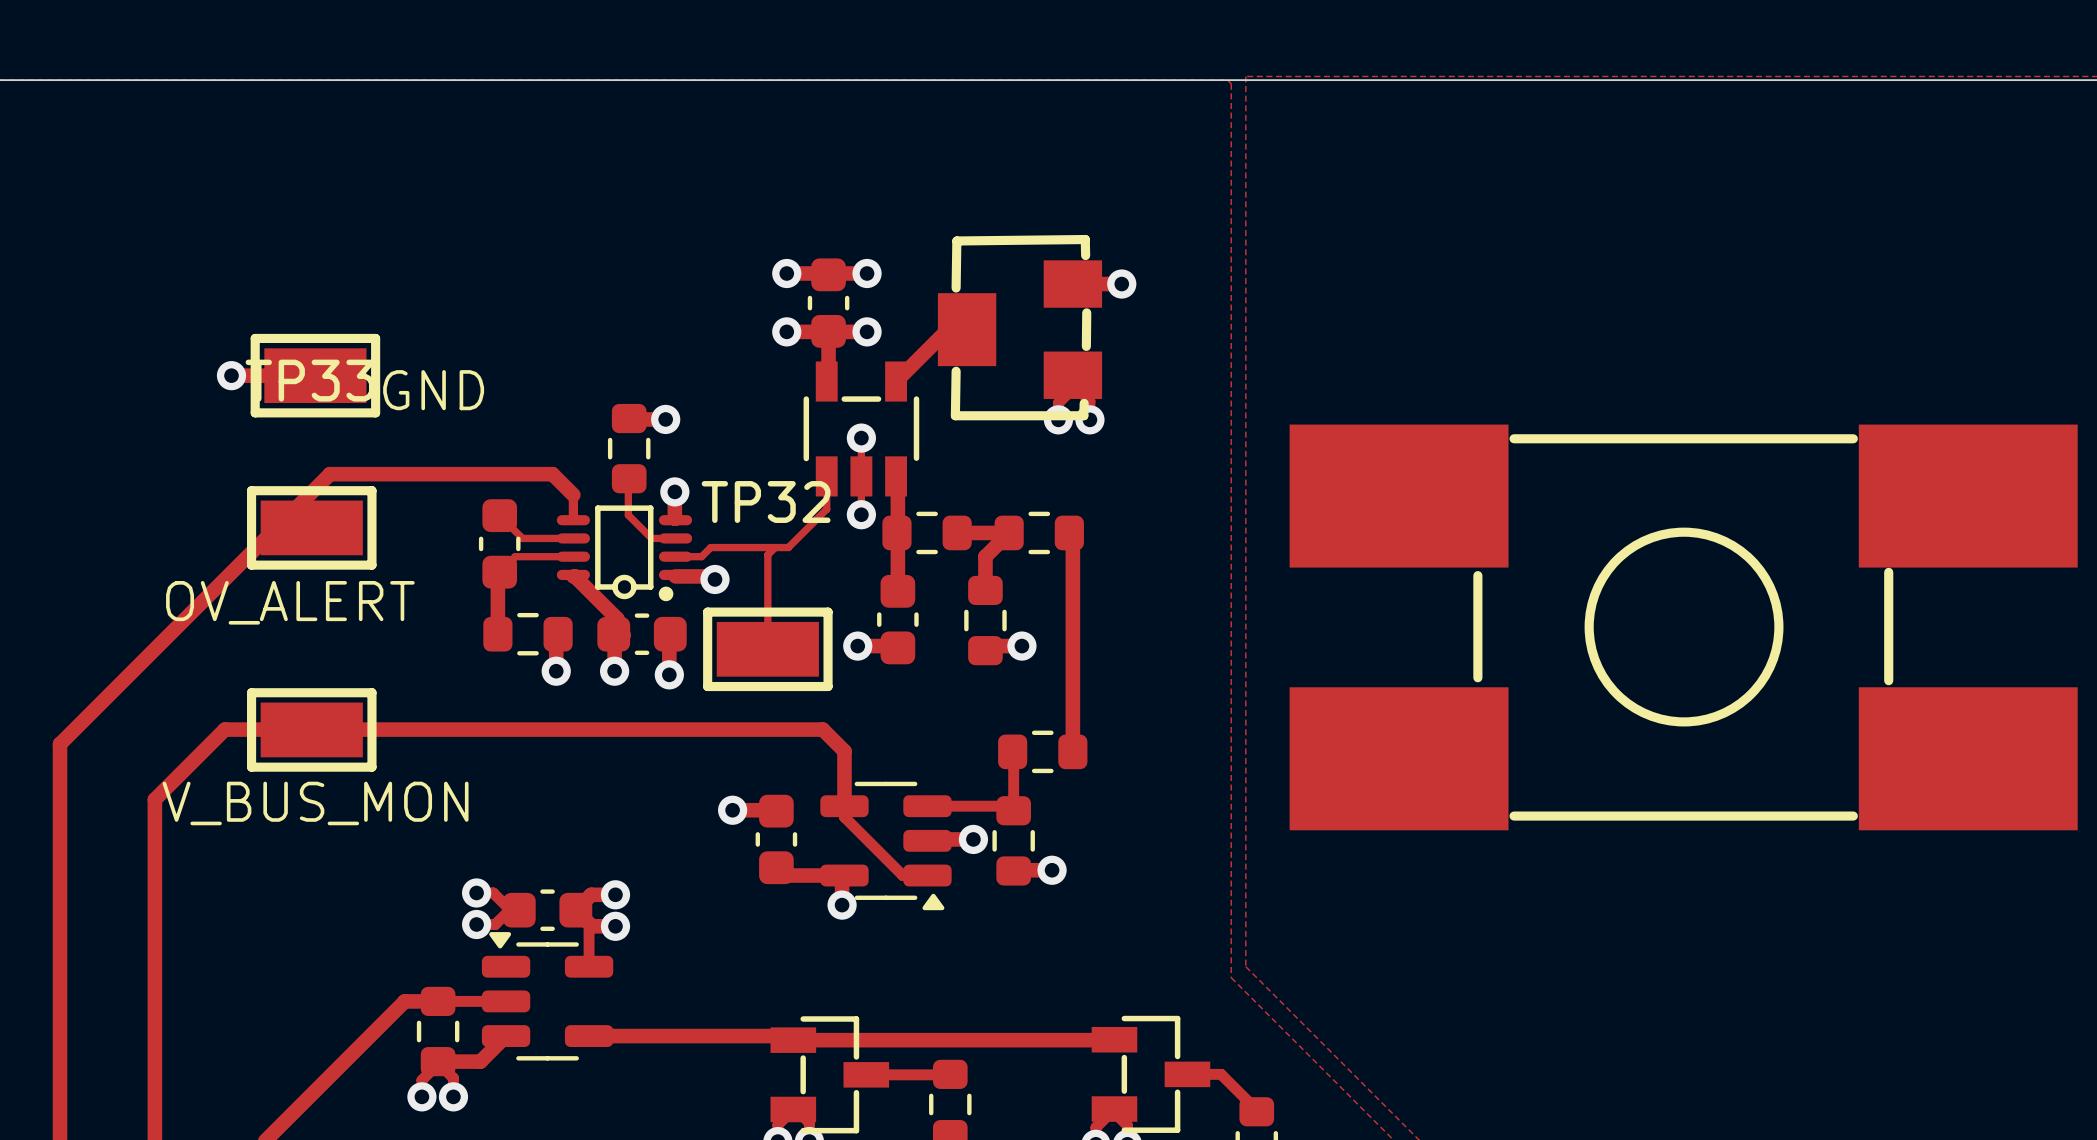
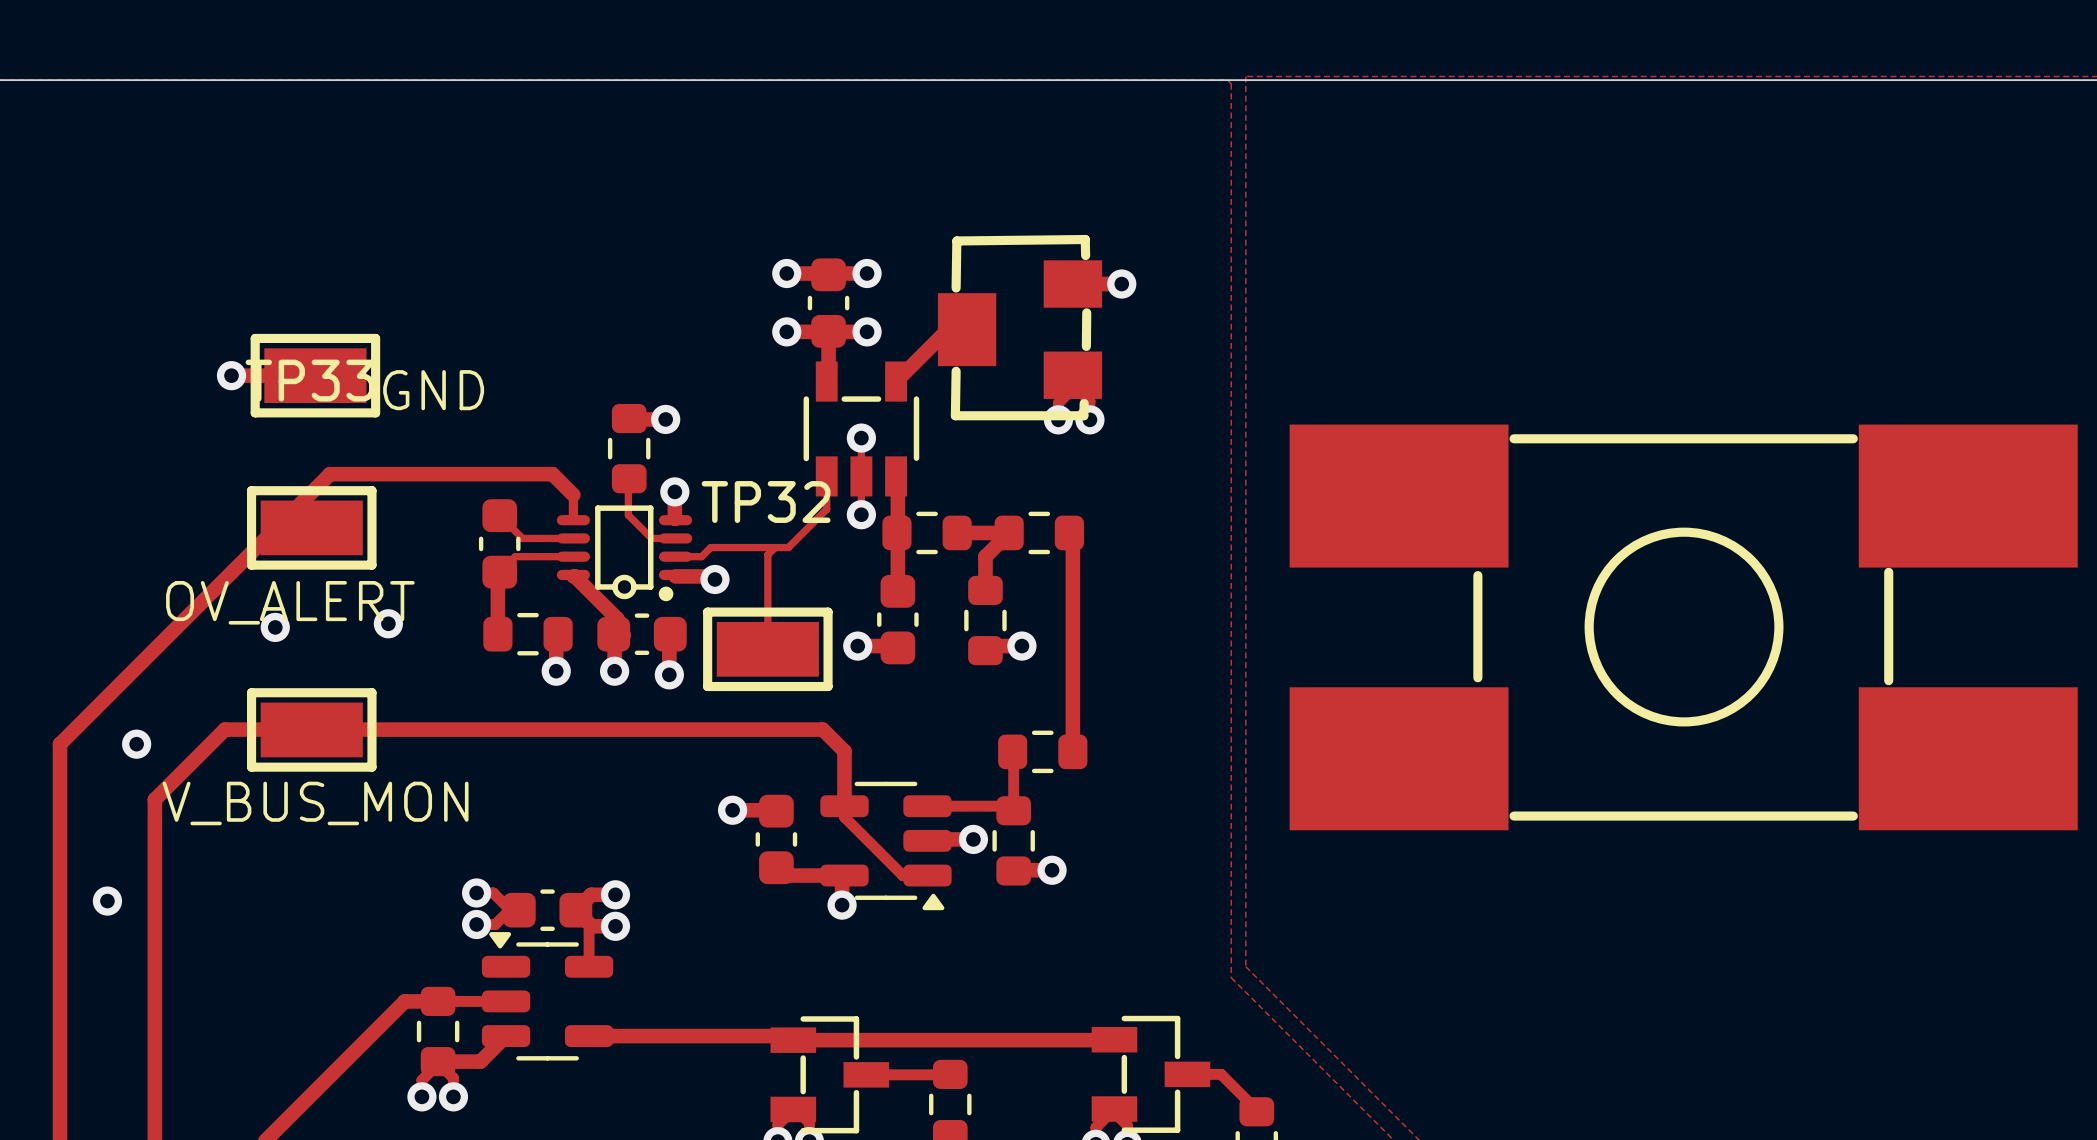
via: none -> (388, 623)
via: none -> (275, 627)
via: none -> (136, 744)
via: none -> (107, 901)

